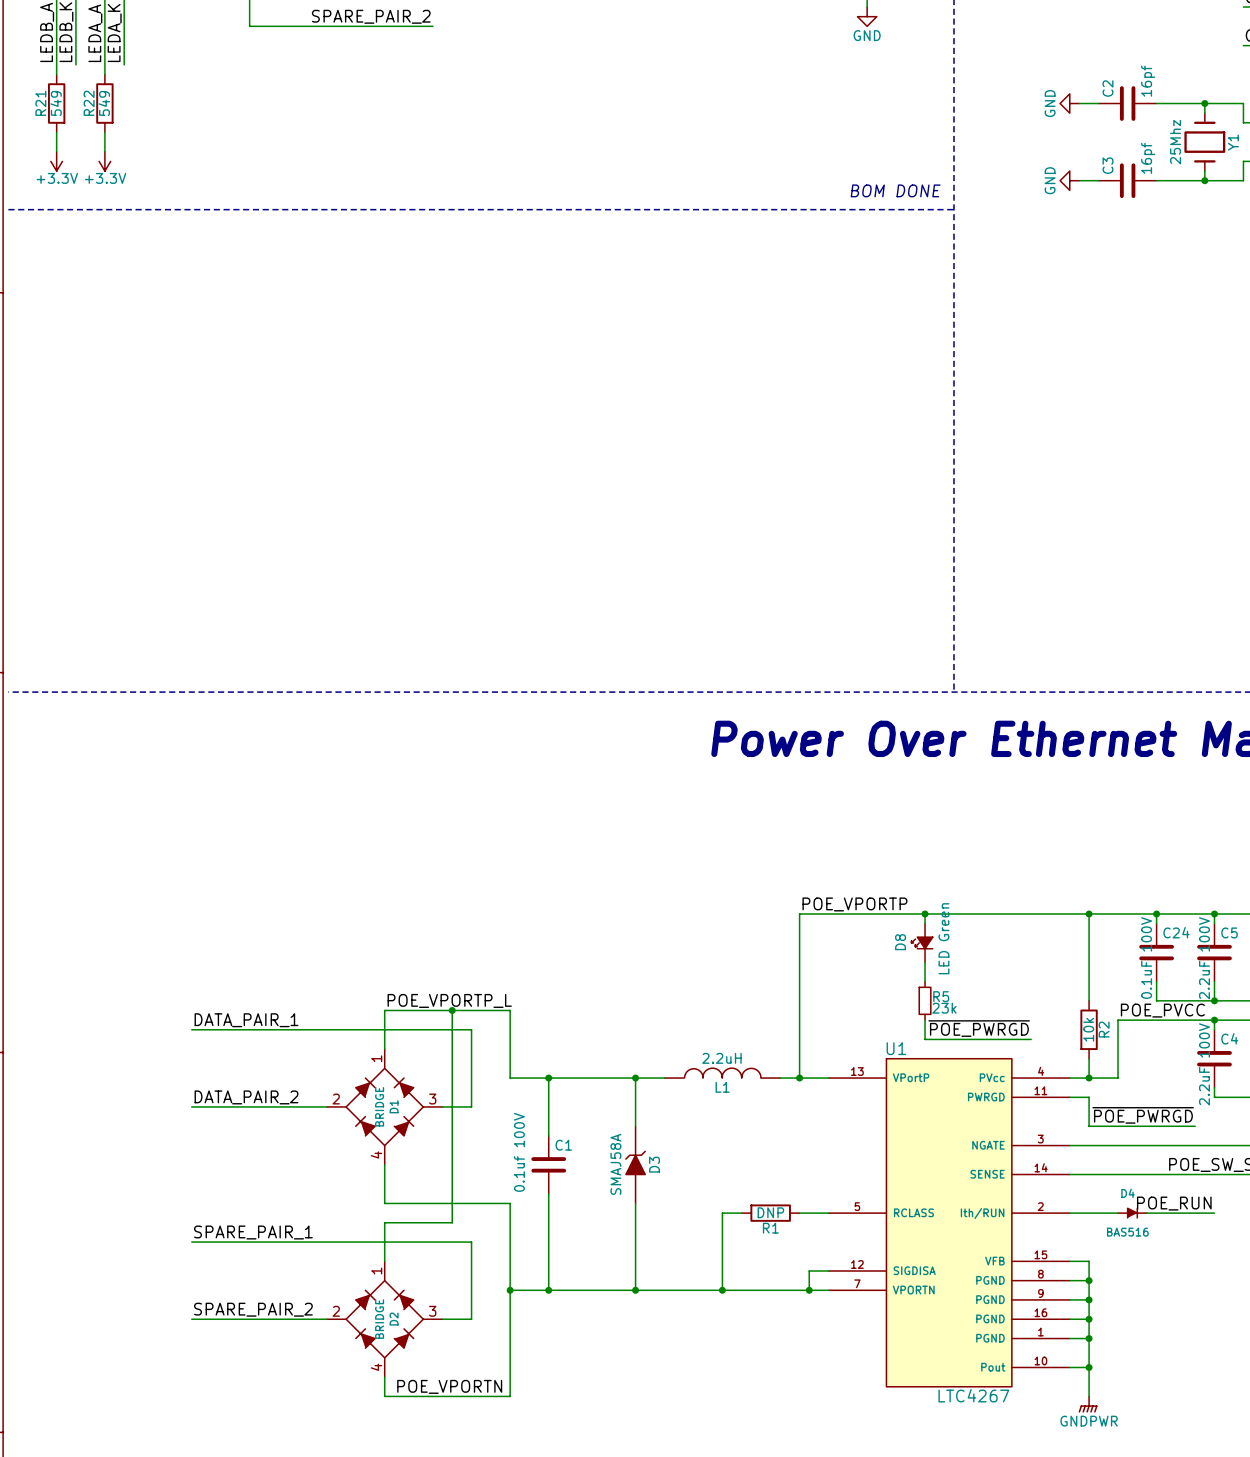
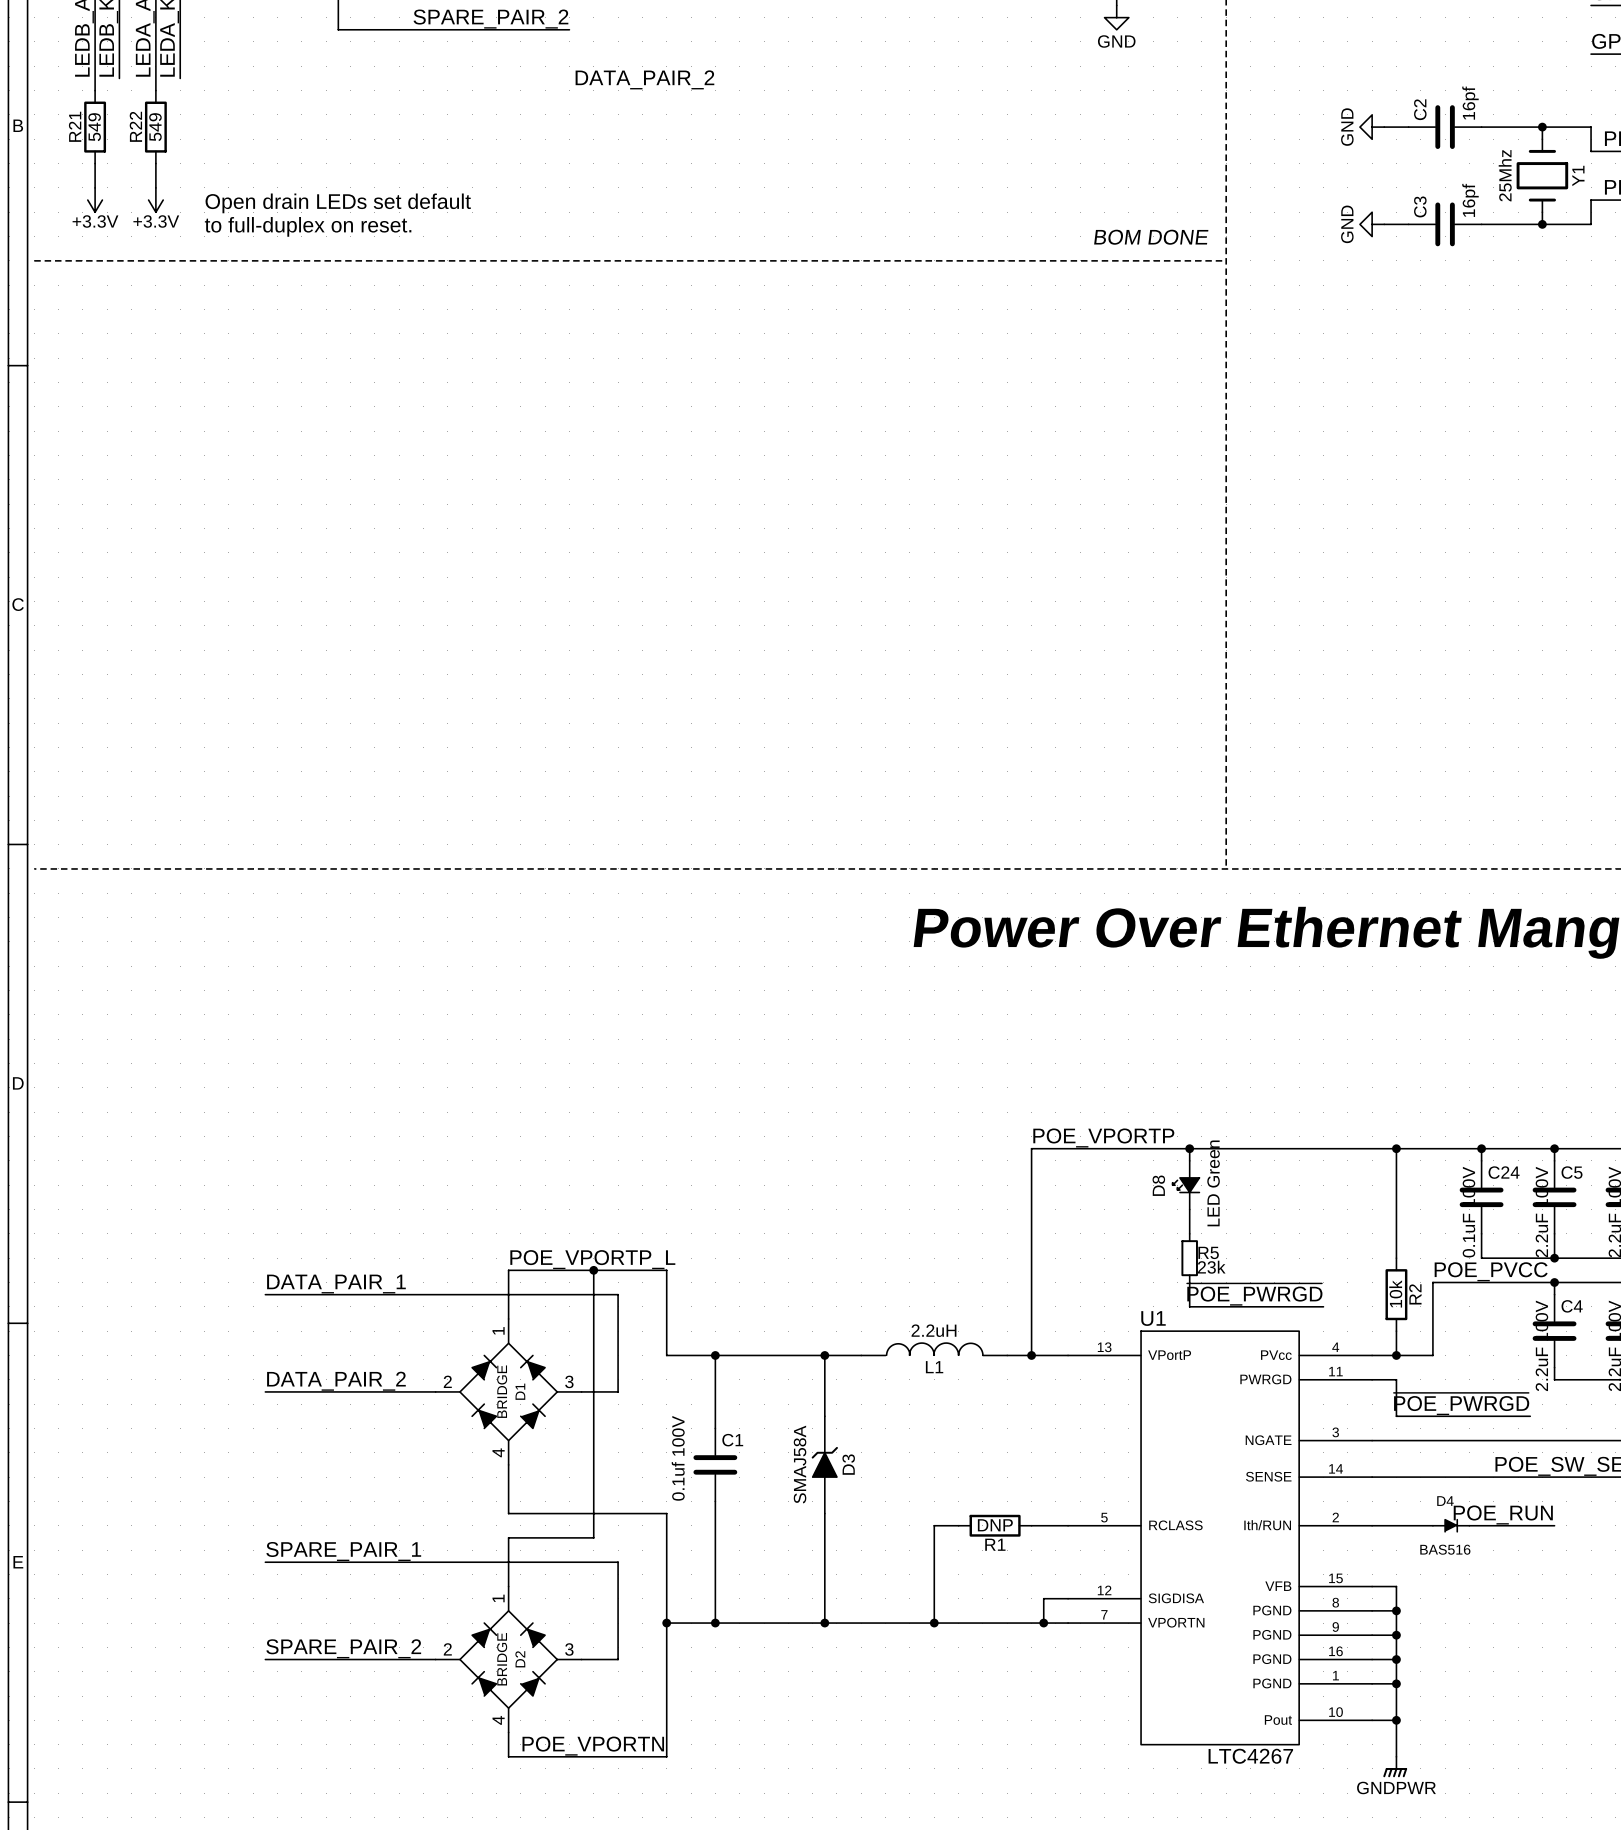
label: none -> DATA_PAIR_2 (644, 79)
text: none -> Open drain LEDs set default (338, 203)
text: none -> to full-duplex on reset. (308, 226)

